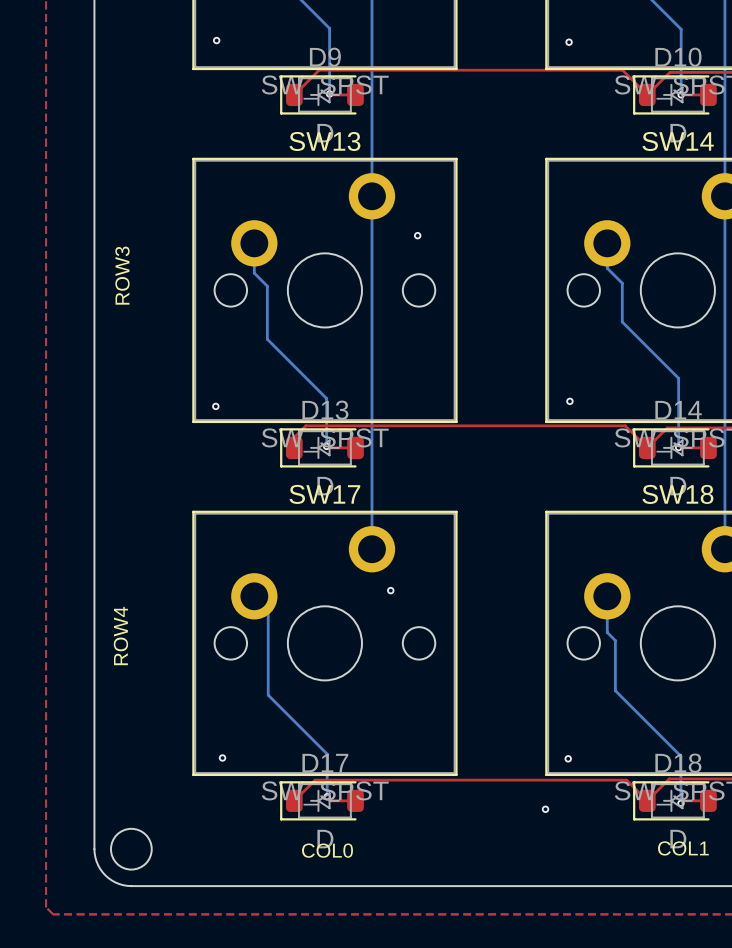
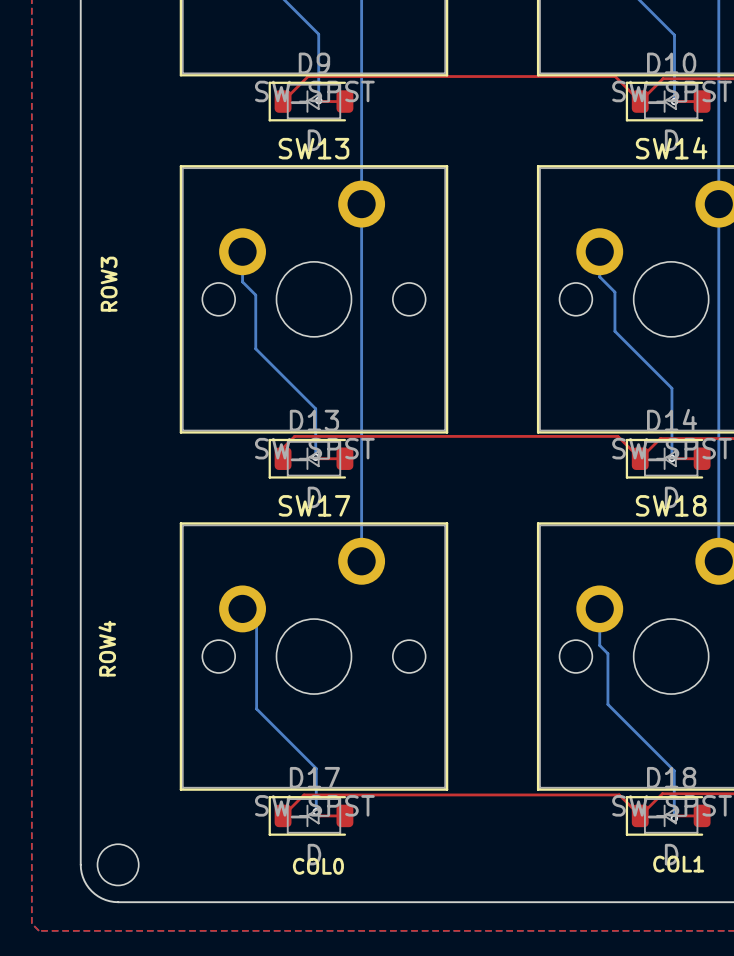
via: (216, 40) -> none
via: (569, 42) -> none
via: (417, 235) -> none
via: (569, 401) -> none
via: (215, 406) -> none
via: (390, 590) -> none
via: (222, 757) -> none
via: (568, 758) -> none
via: (545, 809) -> none

